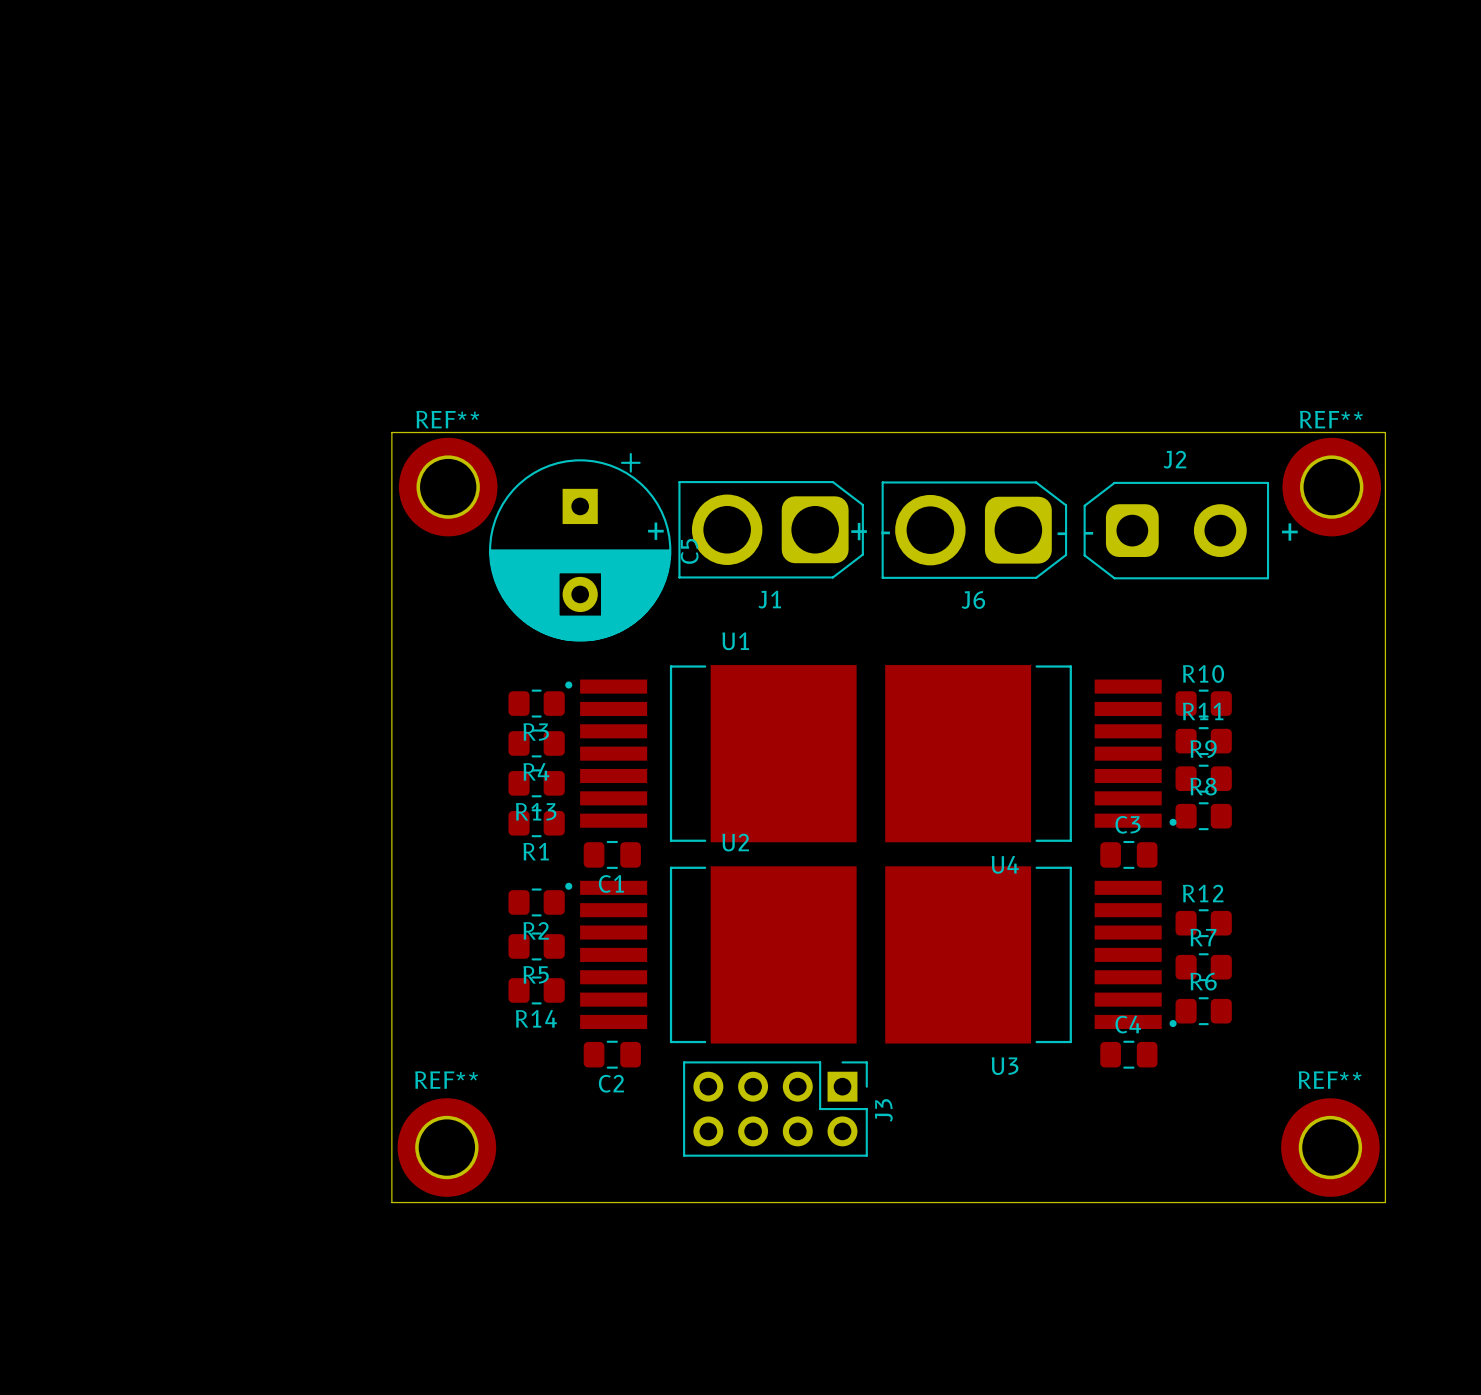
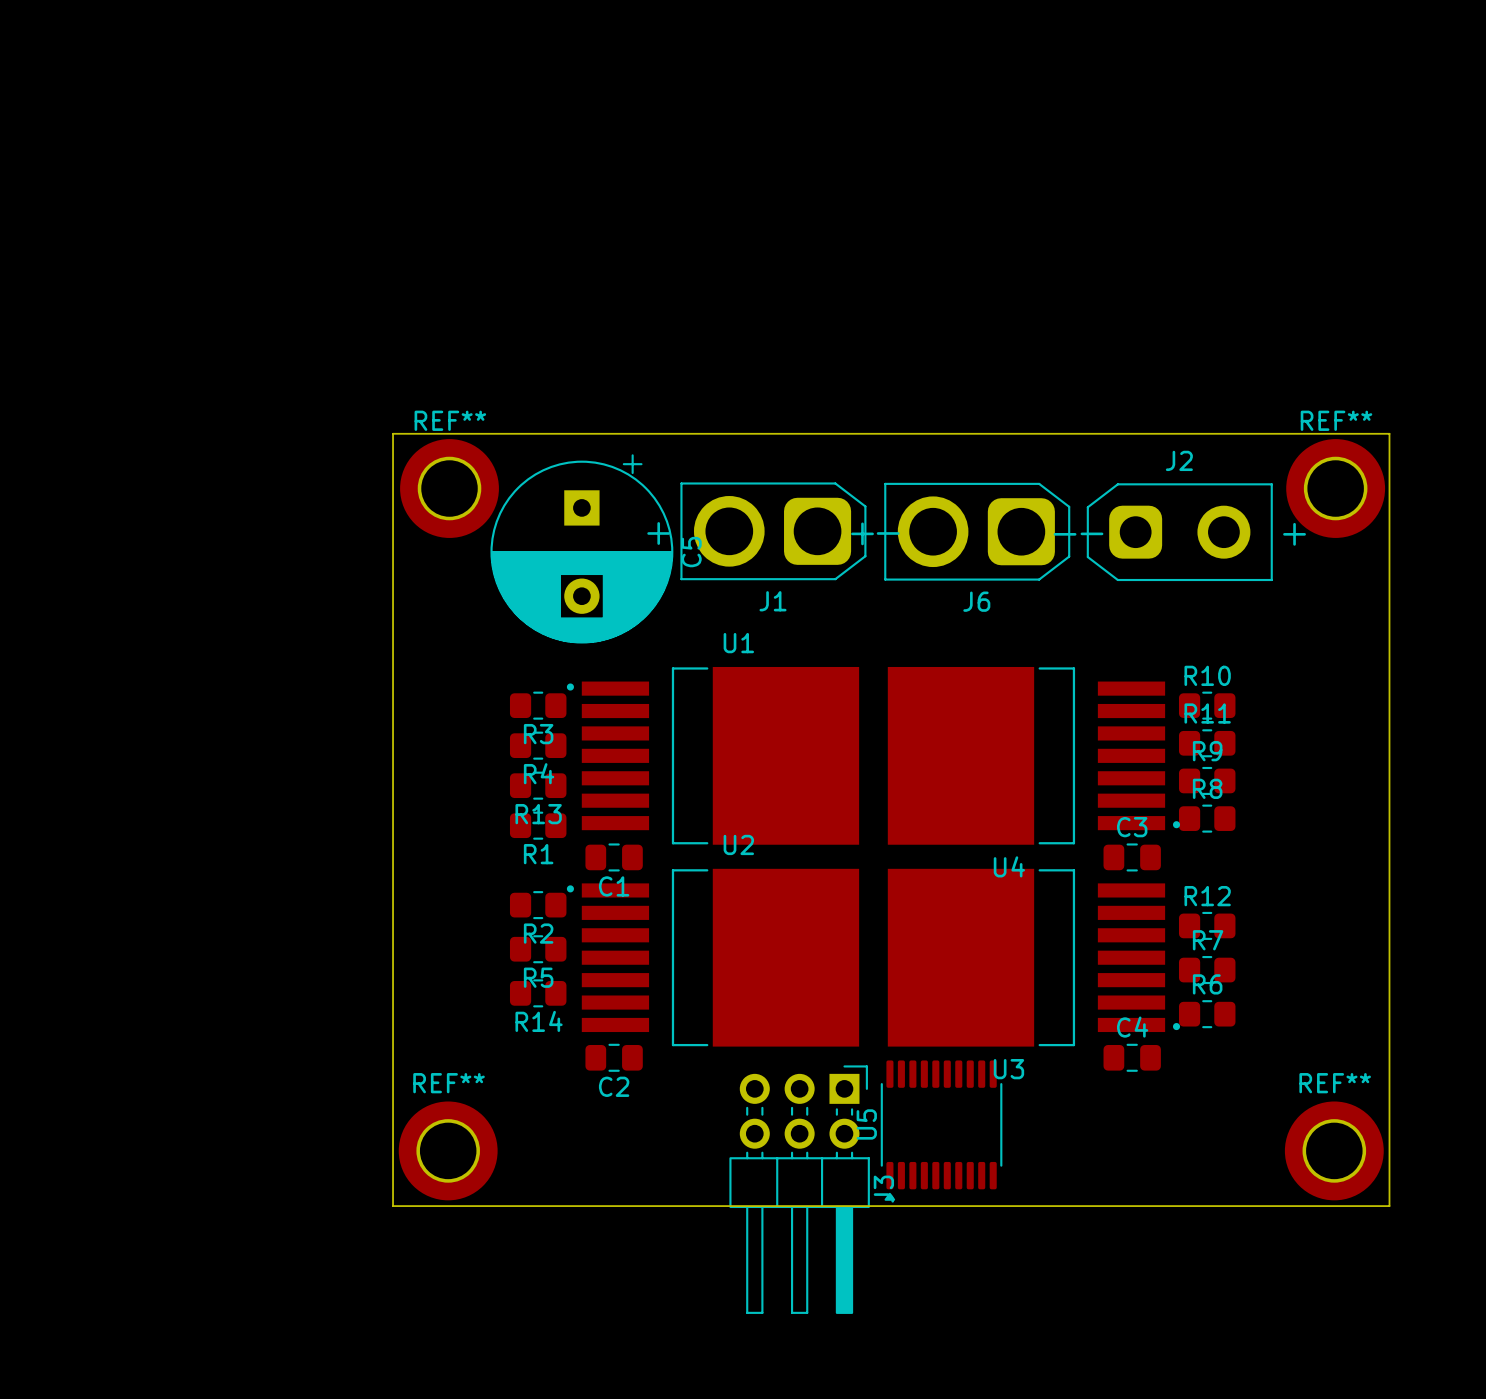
J3 footprint: [683, 1061, 868, 1157] -> [729, 1065, 870, 1314]
U5: none -> (941, 1130)

